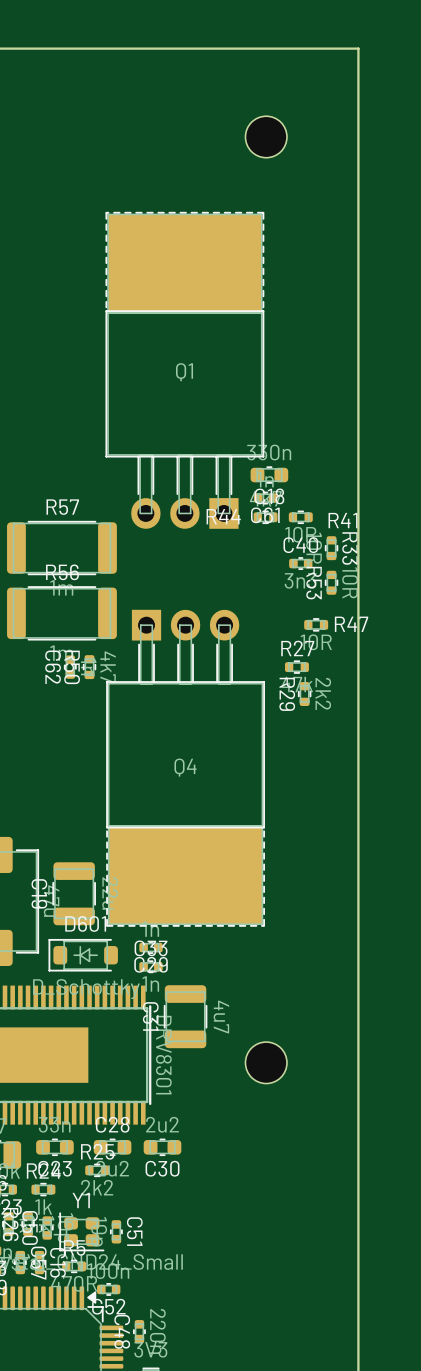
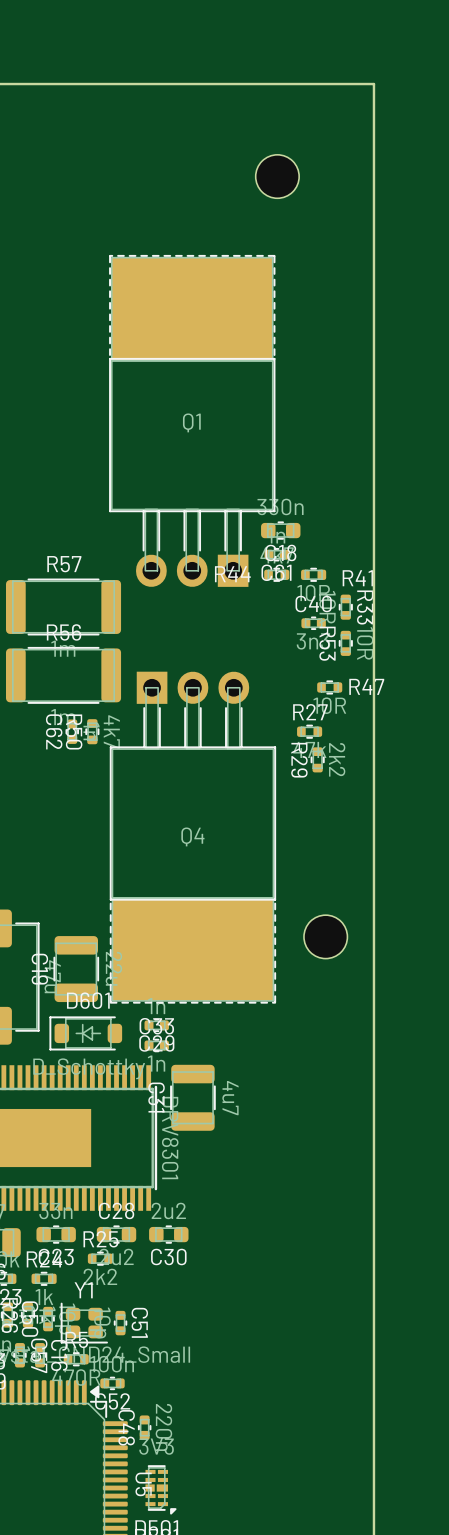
part position: (266, 1062) -> (325, 936)

